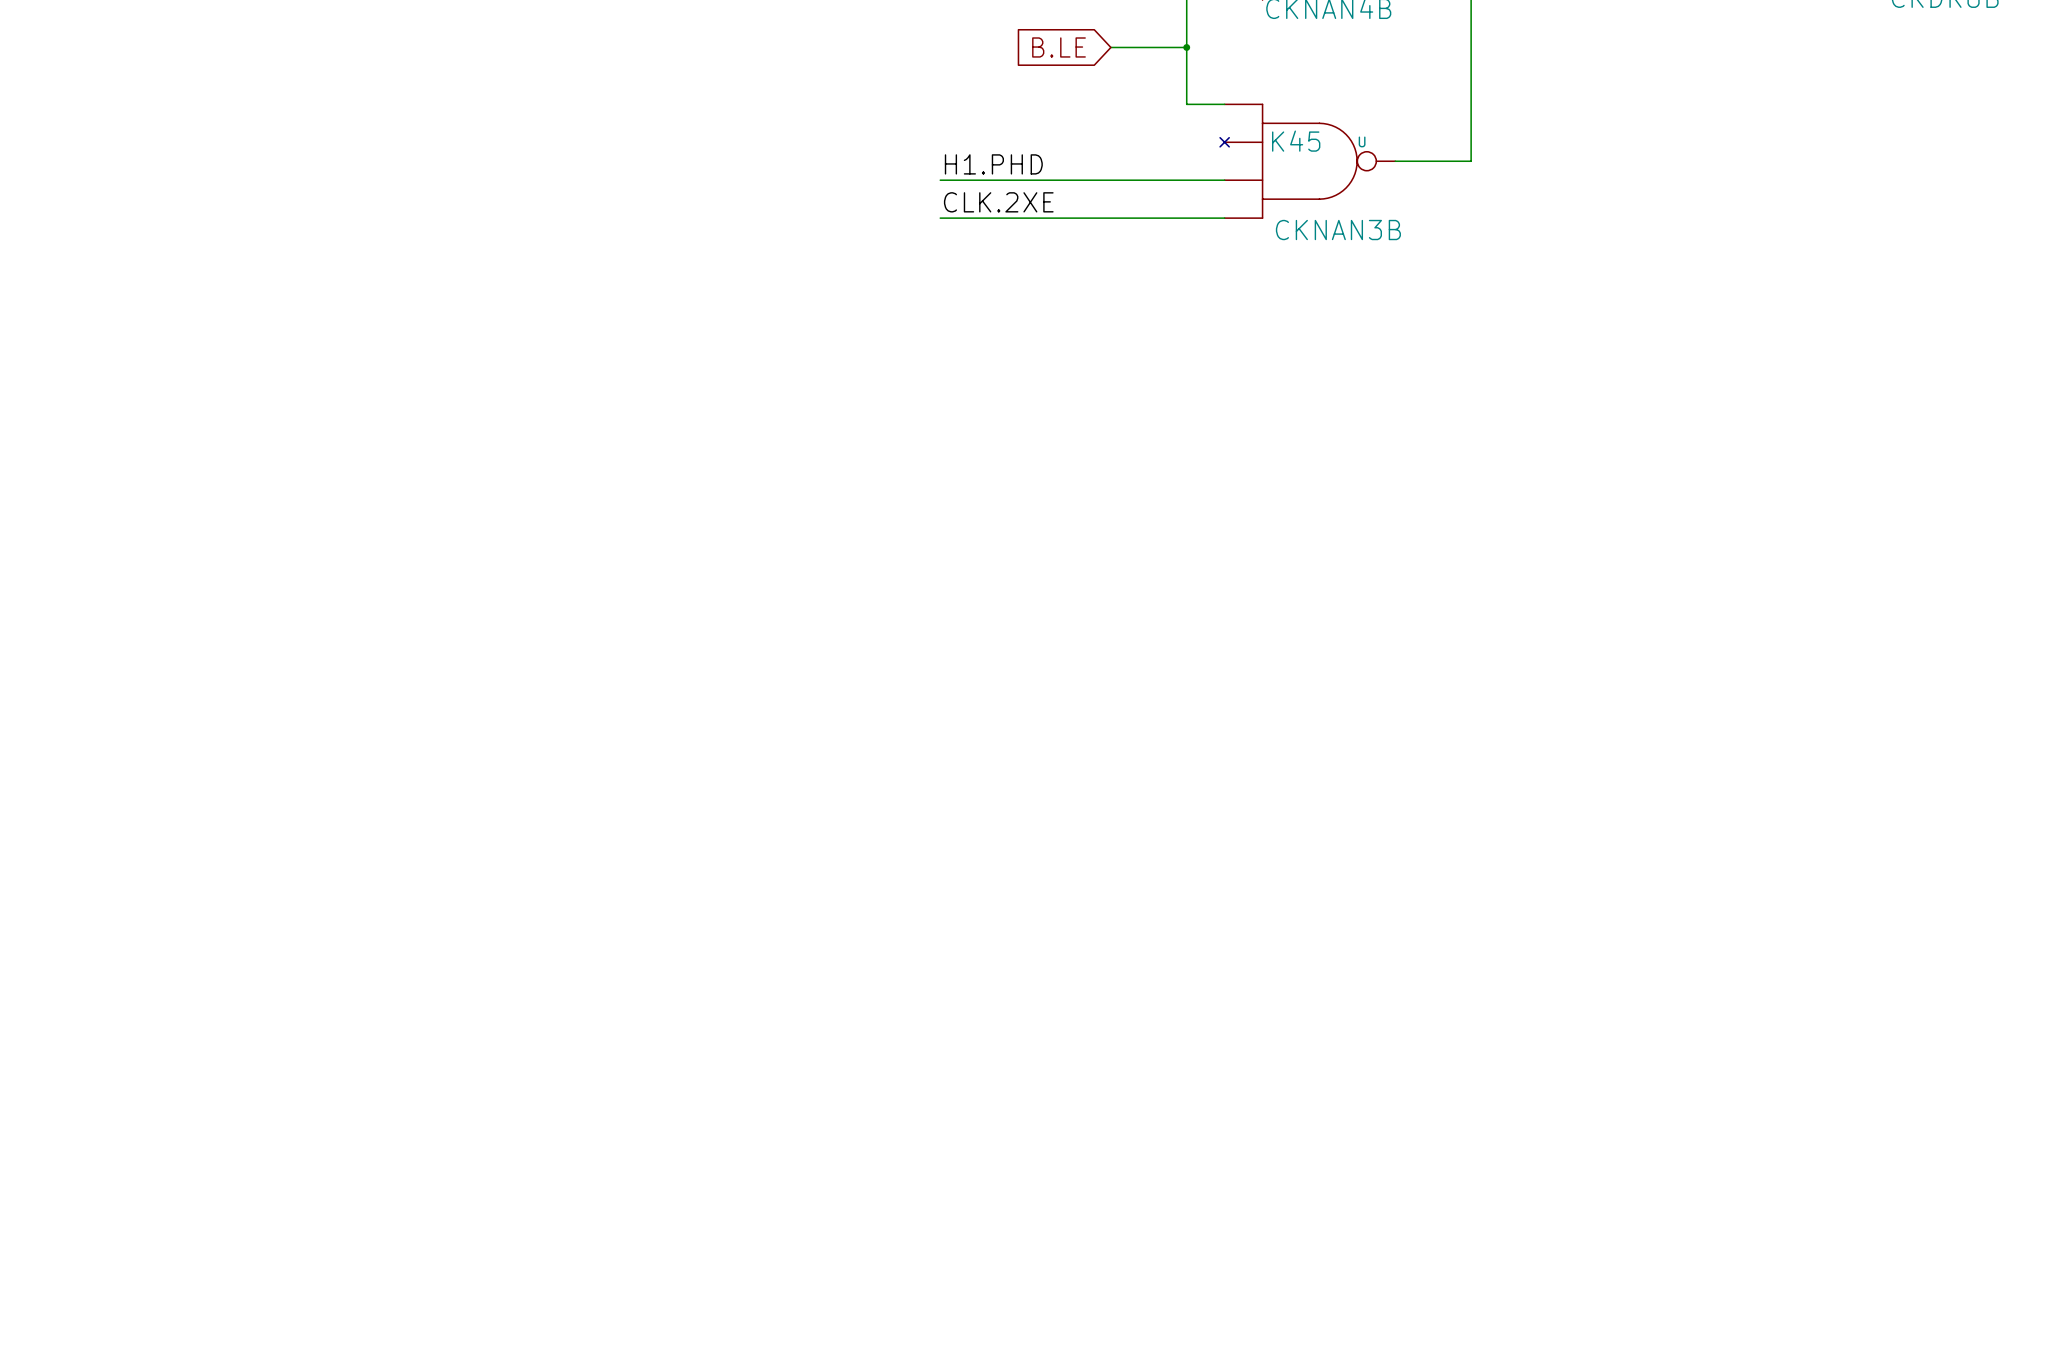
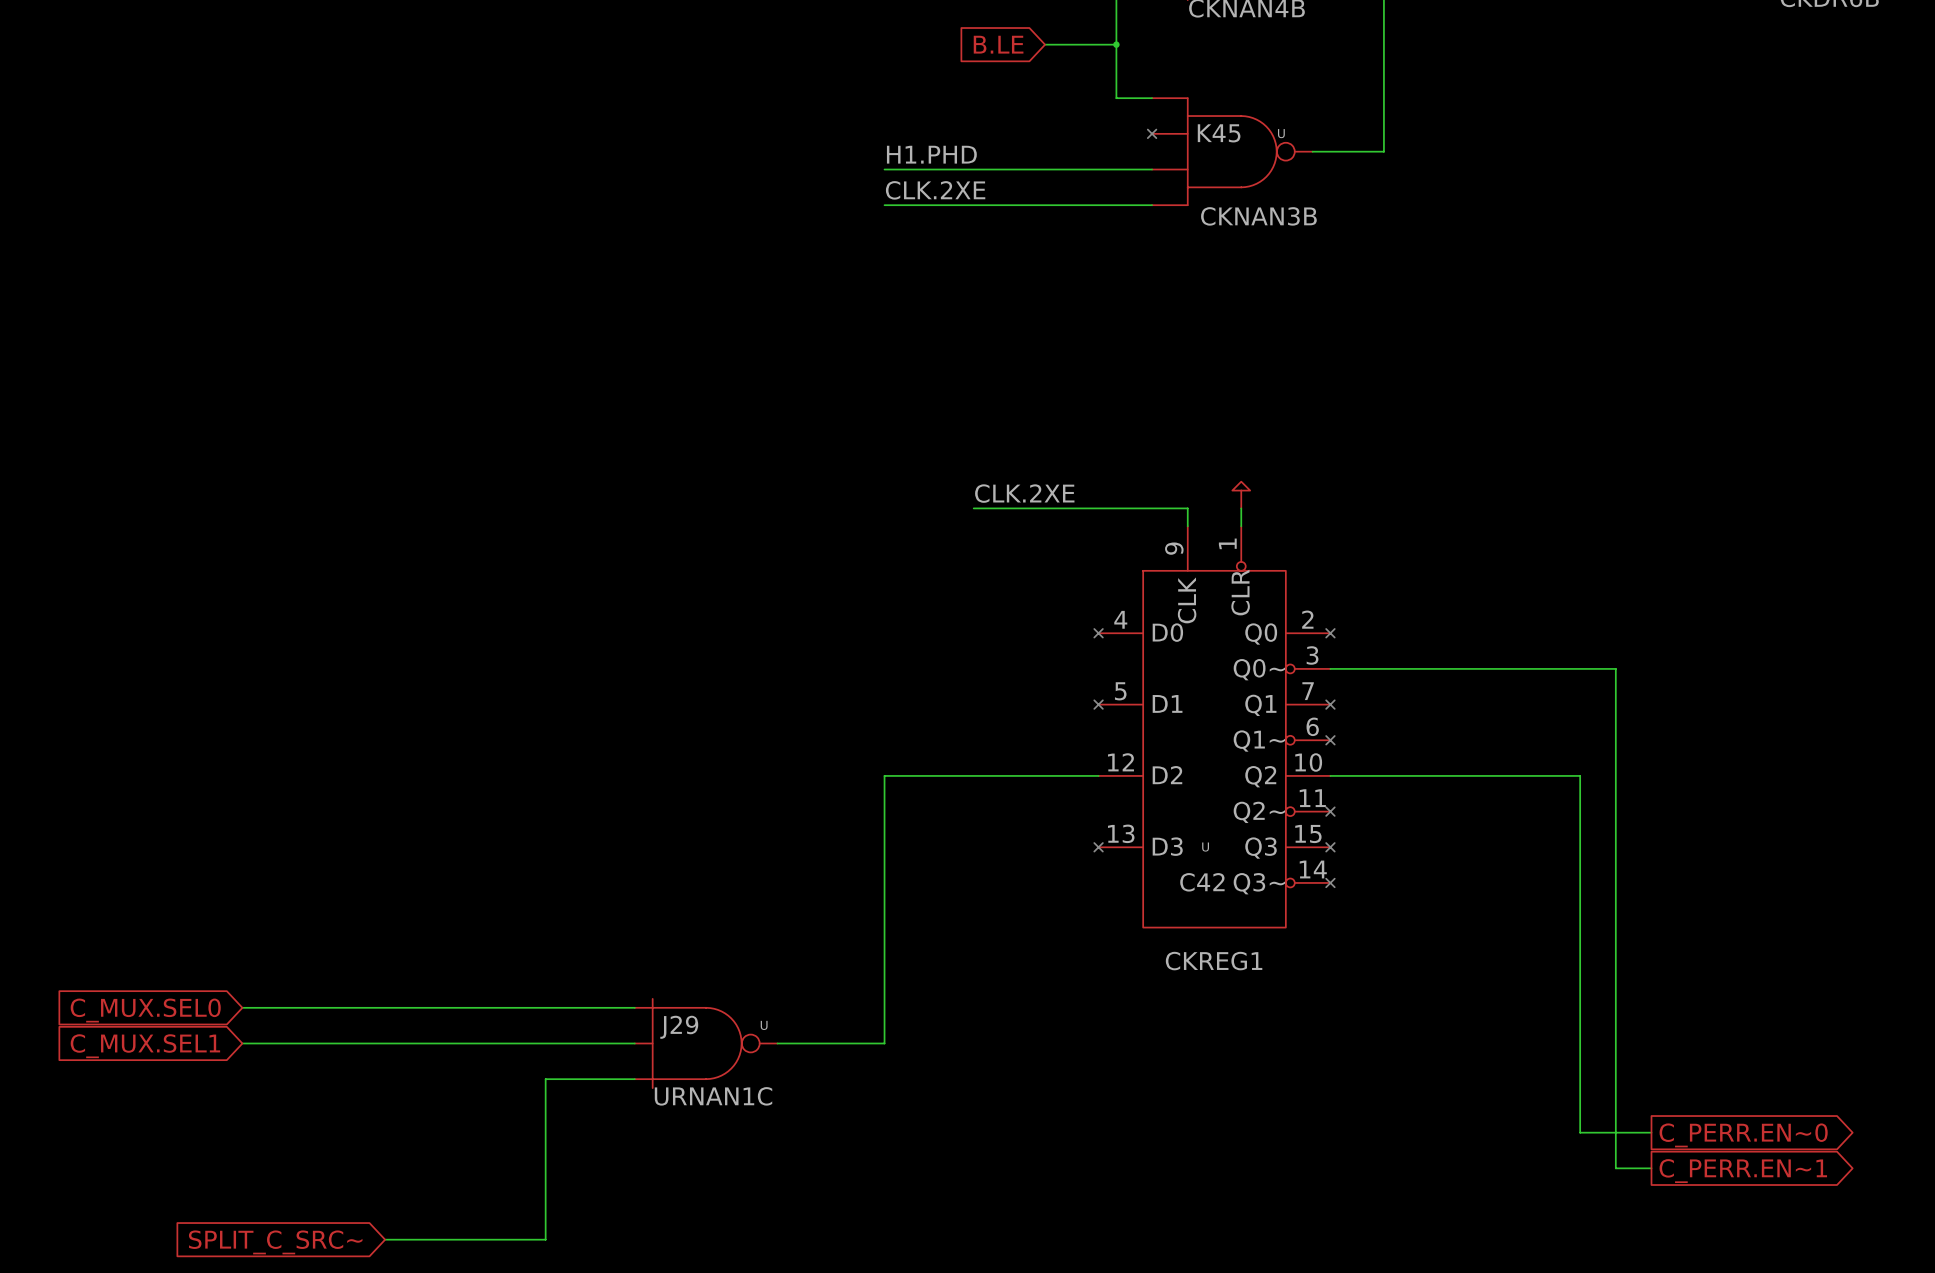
label: none -> CLK.2XE (1024, 493)
power symbol: none -> (1241, 494)
wire: none -> (973, 508) (1187, 508) (1187, 526)
wire: none -> (1241, 508) (1241, 526)
no-connect mark: none -> (1098, 633)
no-connect mark: none -> (1330, 633)
wire: none -> (1330, 668) (1615, 668) (1615, 1168) (1651, 1168)
no-connect mark: none -> (1098, 704)
no-connect mark: none -> (1330, 704)
U: none -> (1214, 726)
no-connect mark: none -> (1330, 740)
wire: none -> (1098, 775) (884, 775) (884, 1043) (777, 1043)
wire: none -> (1330, 775) (1580, 775) (1580, 1132) (1651, 1132)
no-connect mark: none -> (1330, 811)
no-connect mark: none -> (1098, 847)
no-connect mark: none -> (1330, 847)
no-connect mark: none -> (1330, 882)
wire: none -> (242, 1007) (634, 1007)
global label: none -> C_MUX.SEL0 (145, 1010)
wire: none -> (242, 1043) (634, 1043)
U: none -> (706, 1043)
global label: none -> C_MUX.SEL1 (145, 1046)
wire: none -> (634, 1079) (545, 1079) (545, 1239) (385, 1239)
global label: none -> C_PERR.EN~0 (1743, 1135)
global label: none -> C_PERR.EN~1 (1743, 1171)
global label: none -> SPLIT_C_SRC~ (275, 1242)

